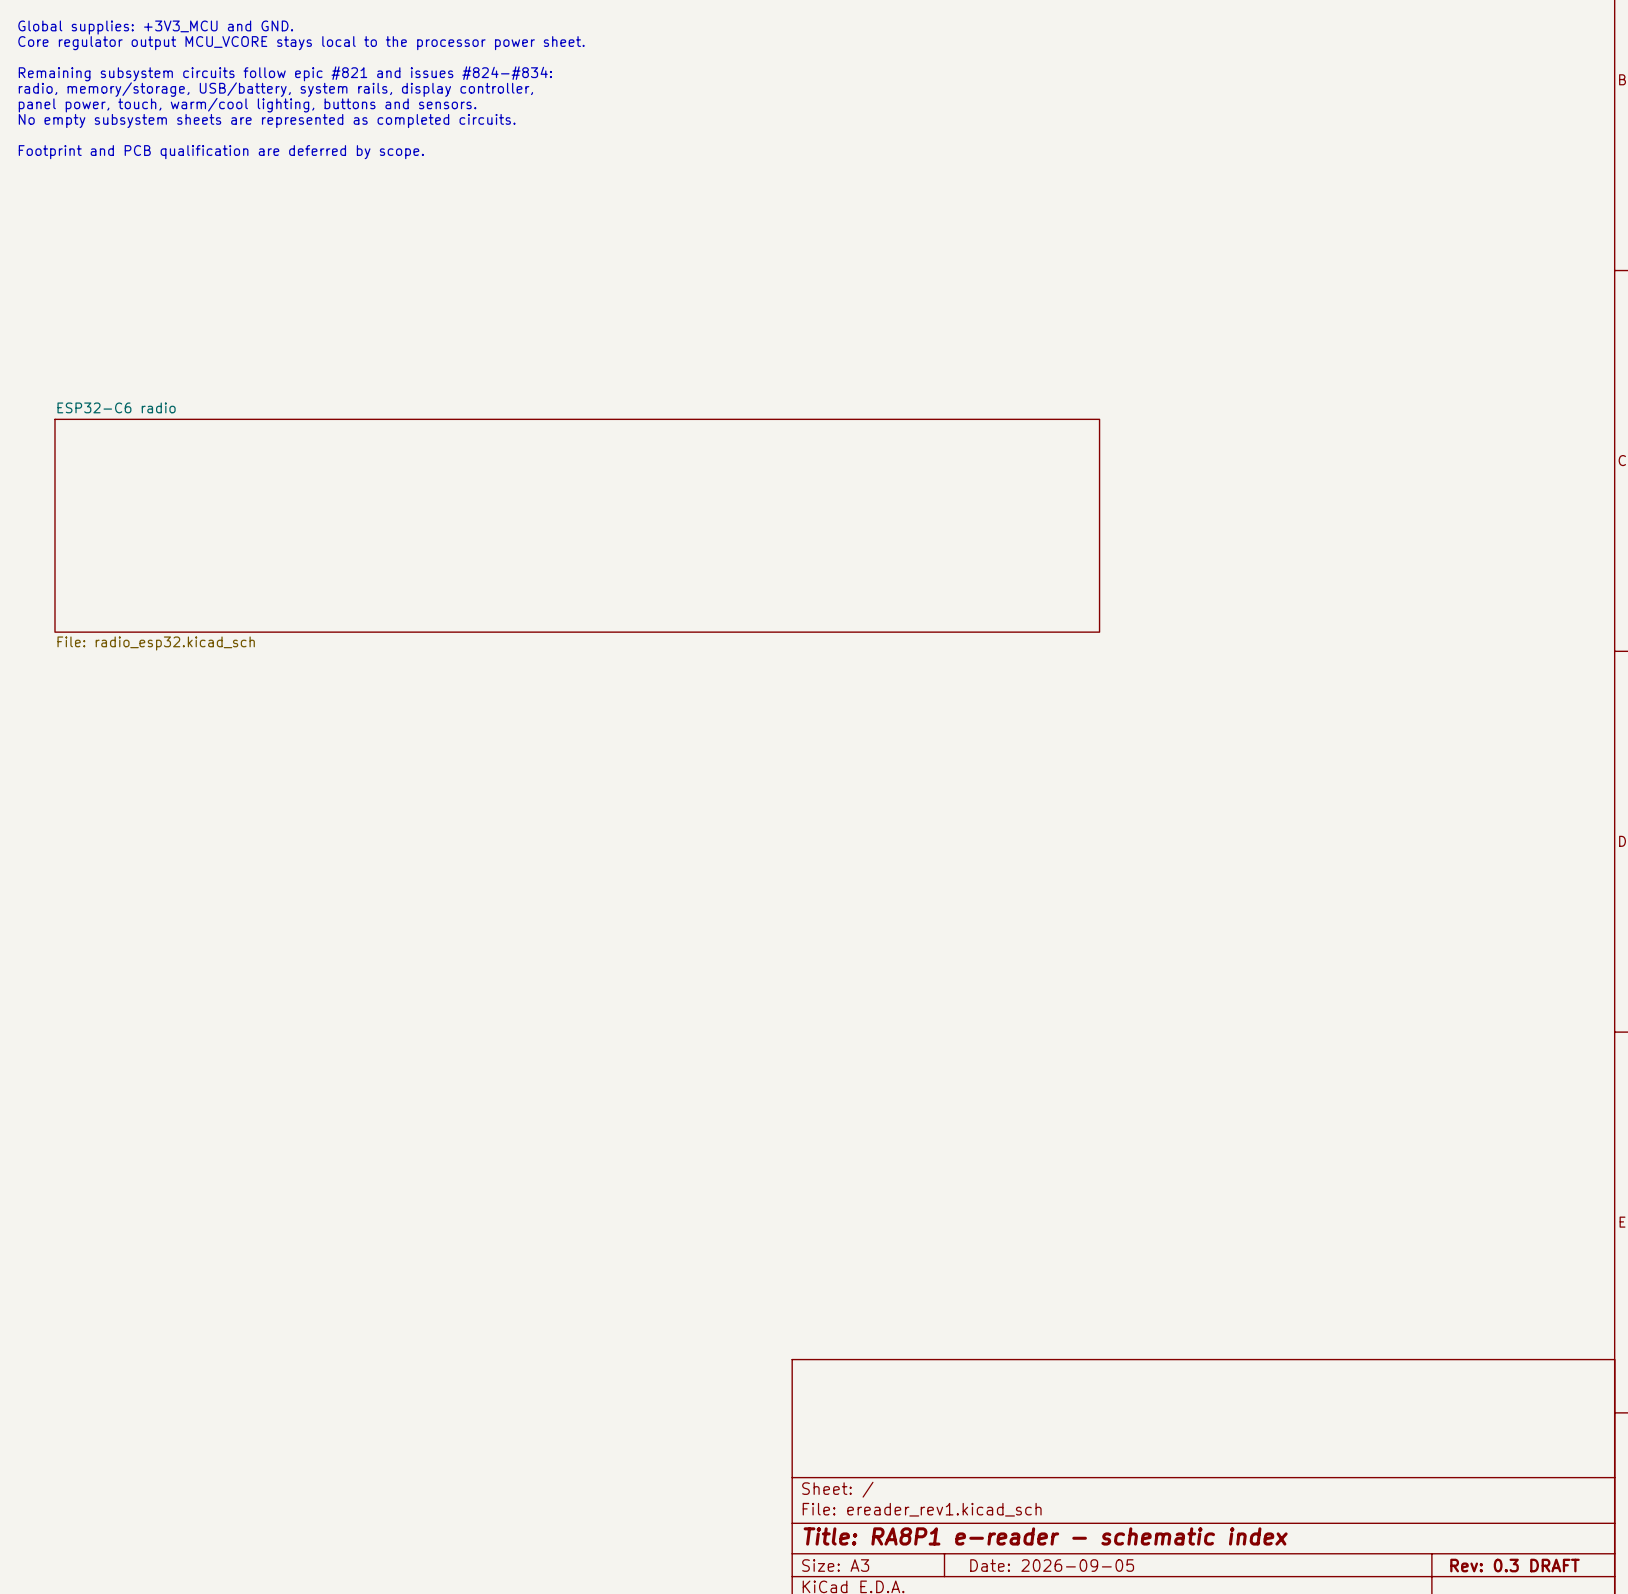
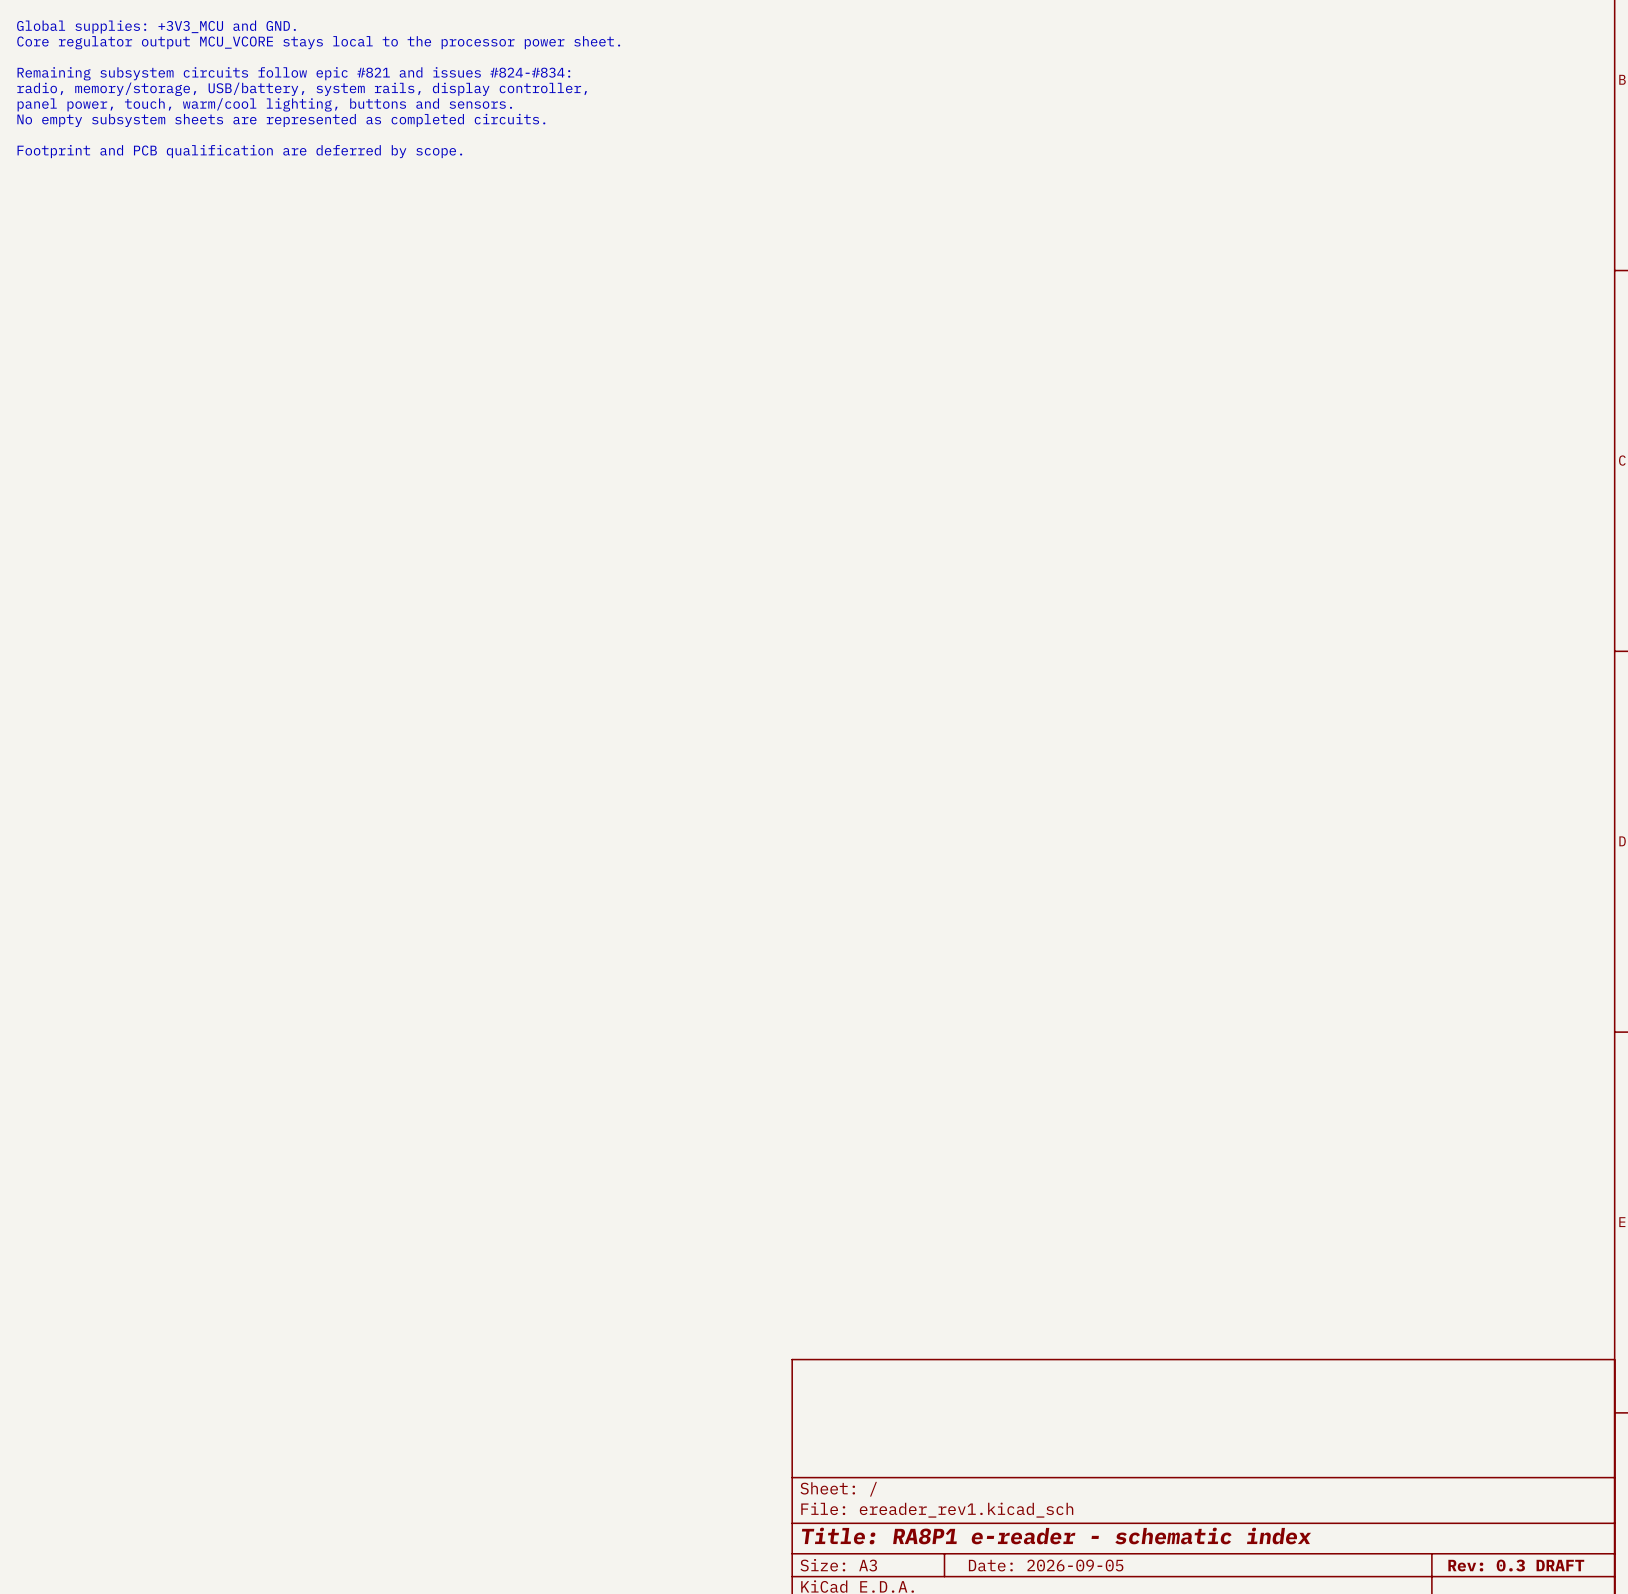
sheet ESP32-C6 radio: File: radio_esp32.kicad_sch (577, 525) -> none

